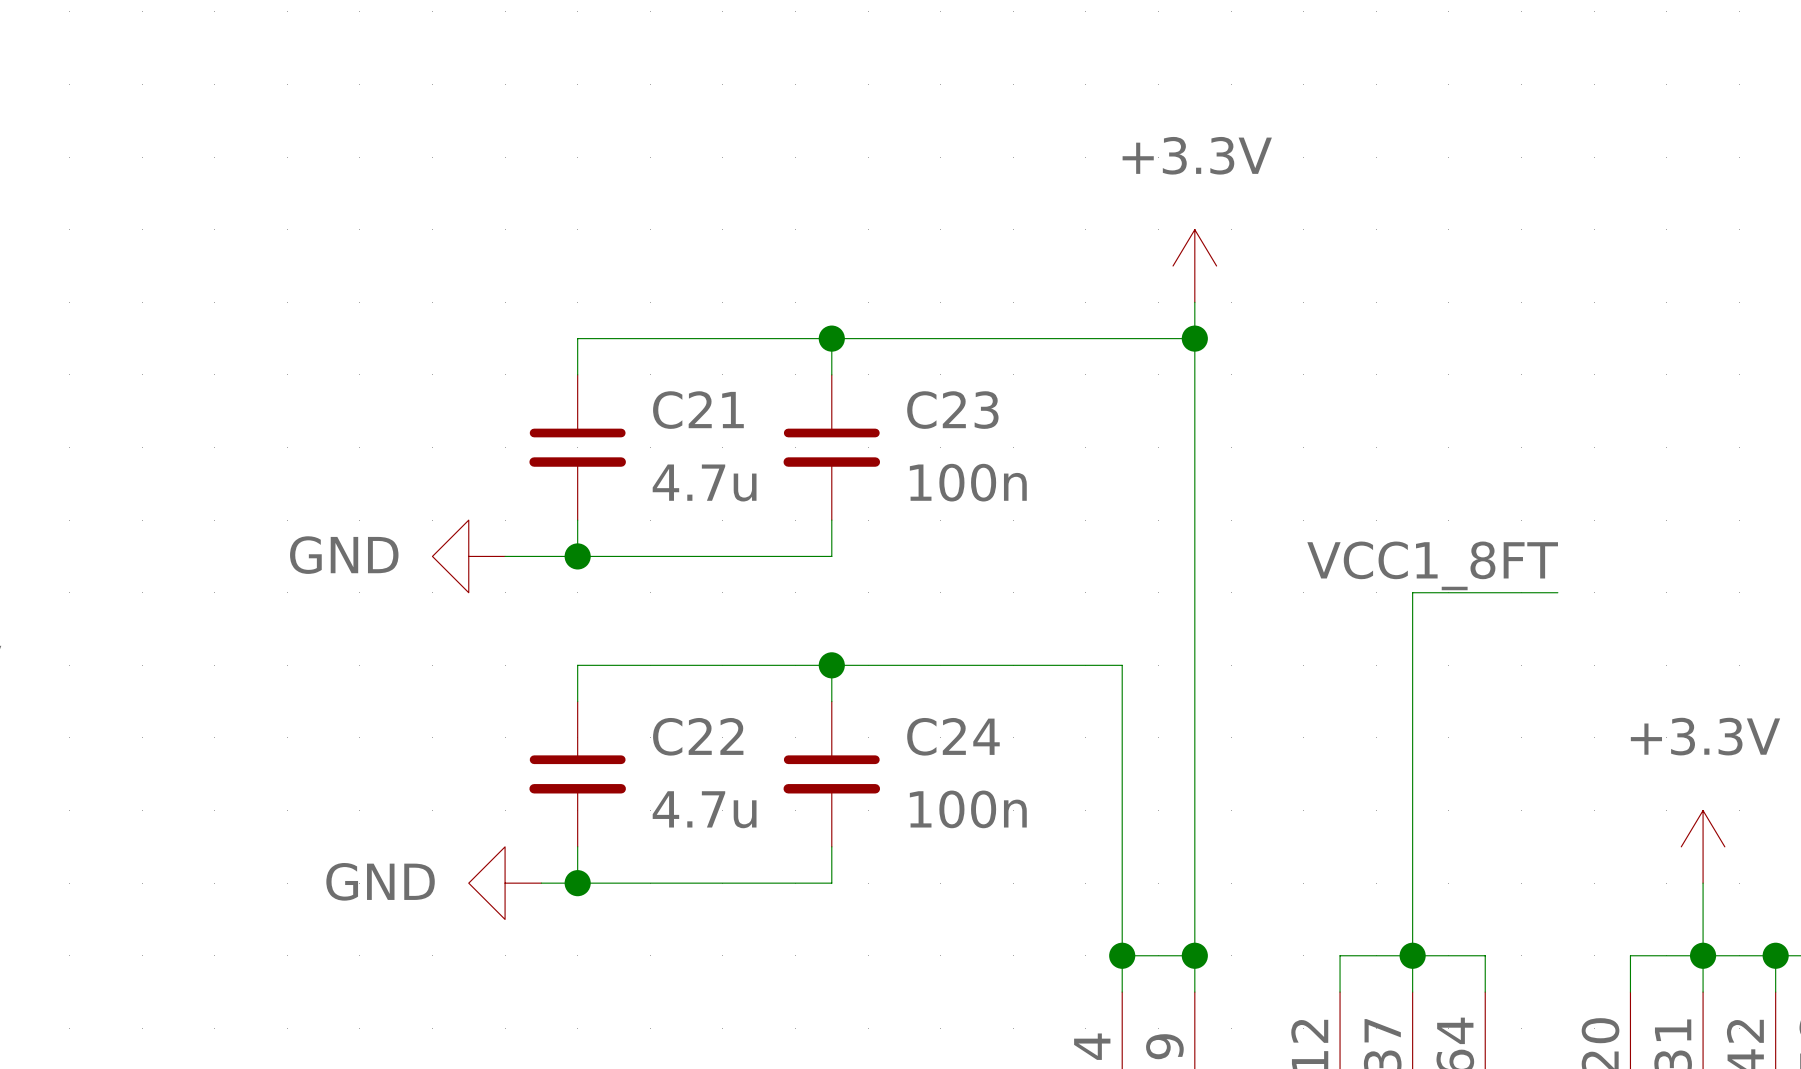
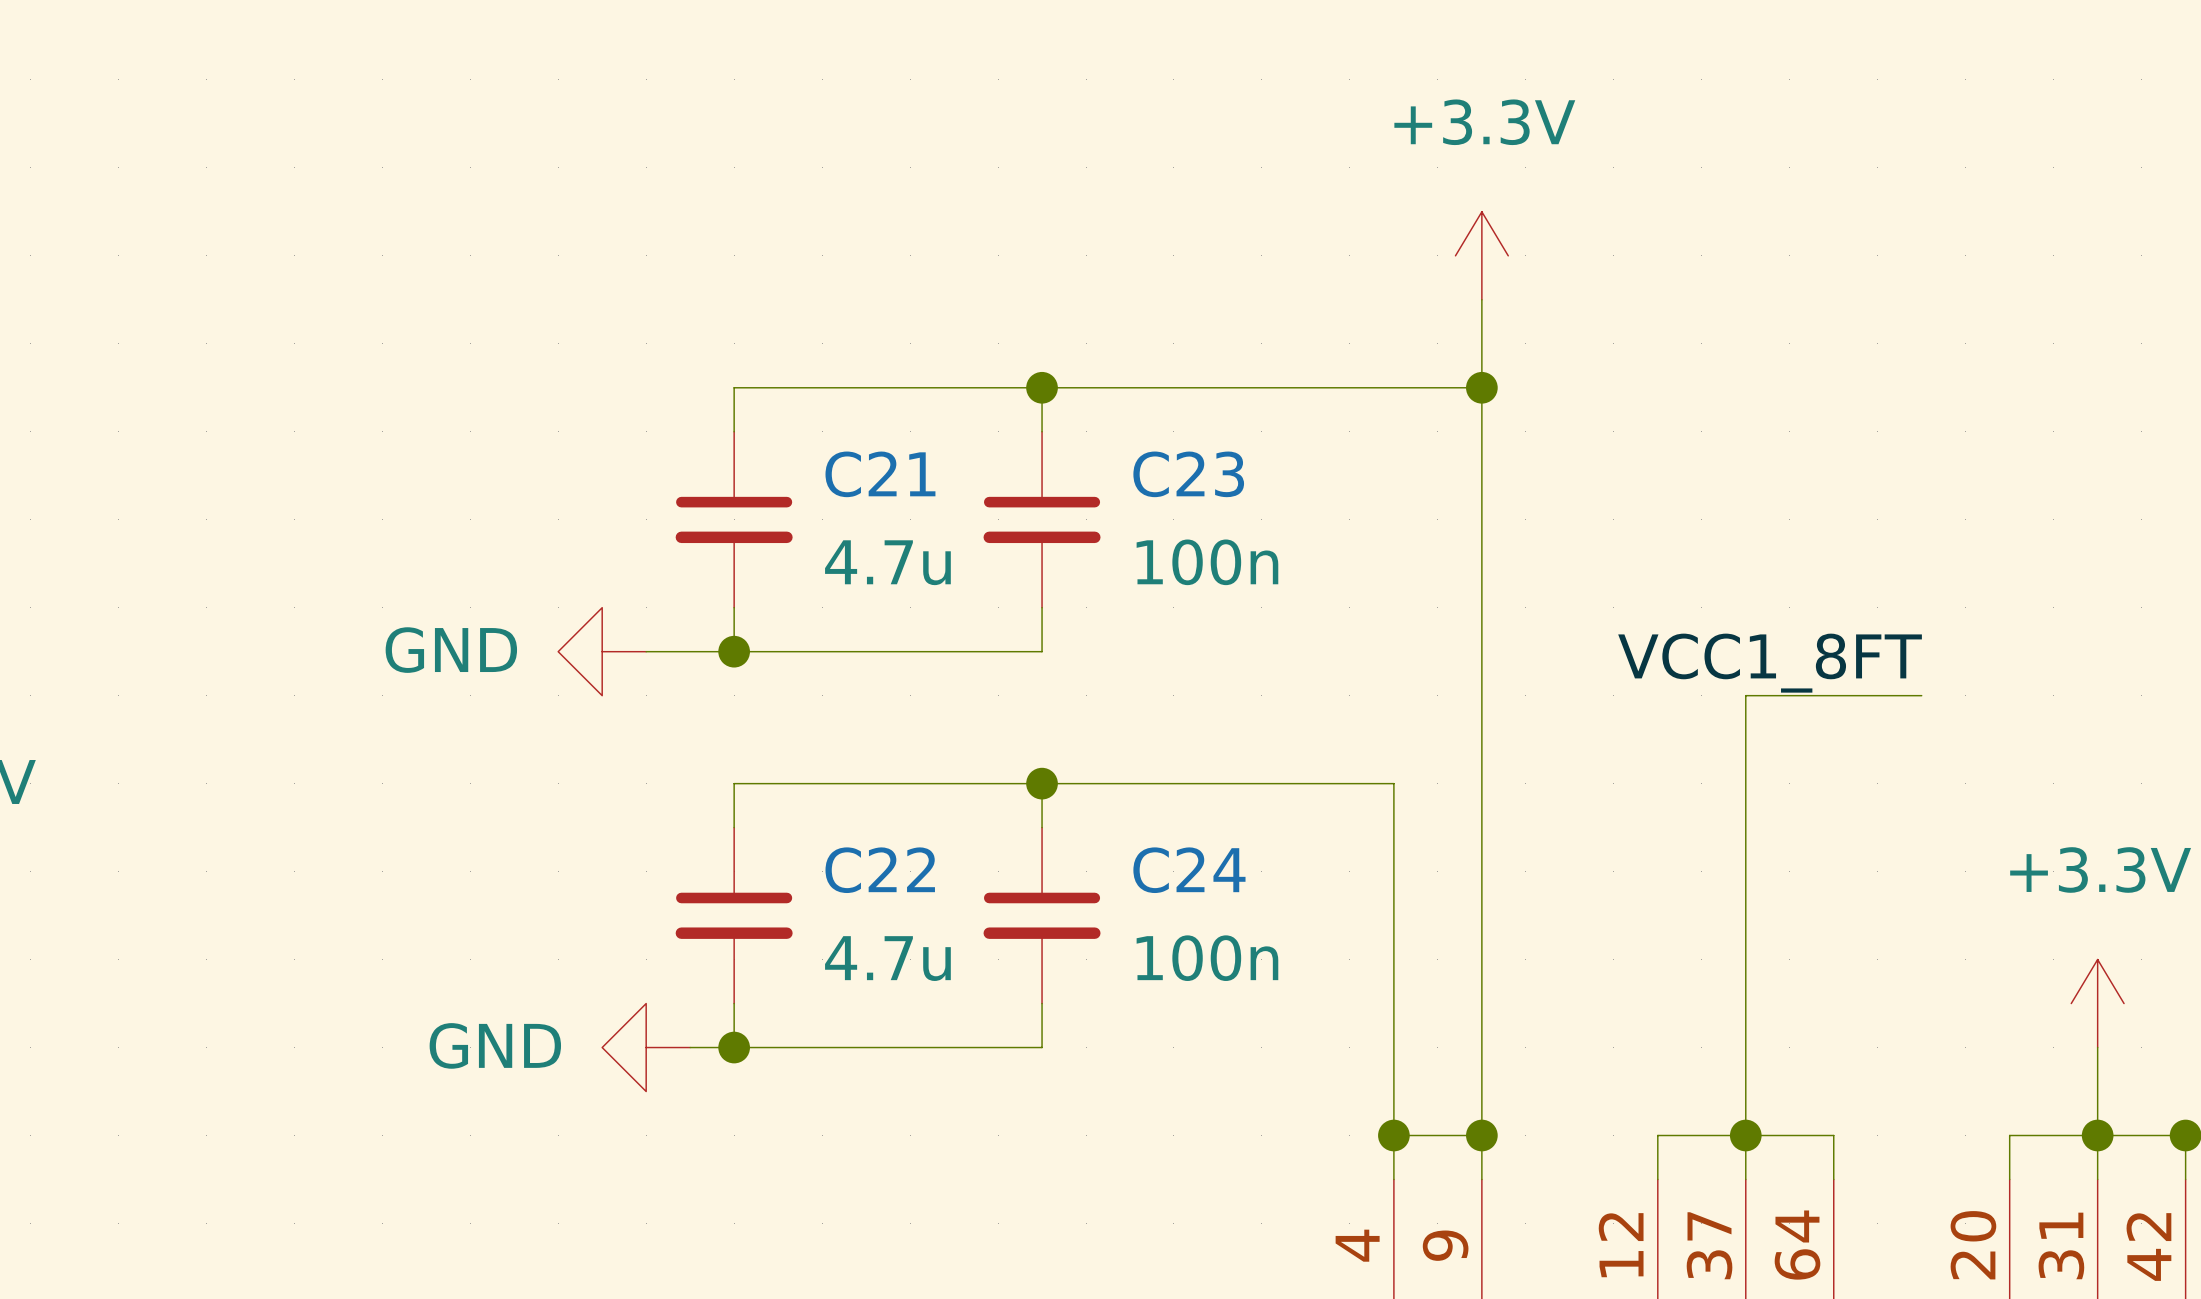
power symbol position: +3.3V (1194, 266) -> +3.3V (1481, 255)

